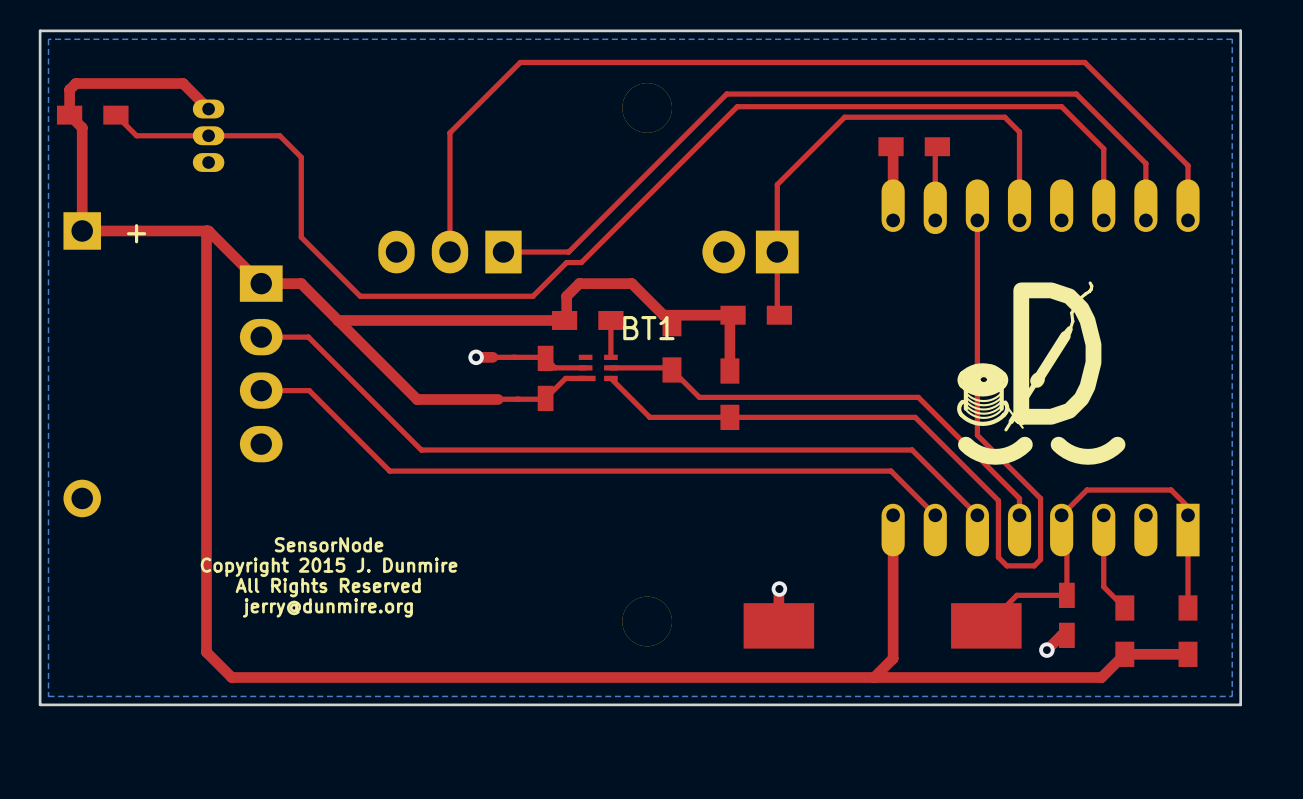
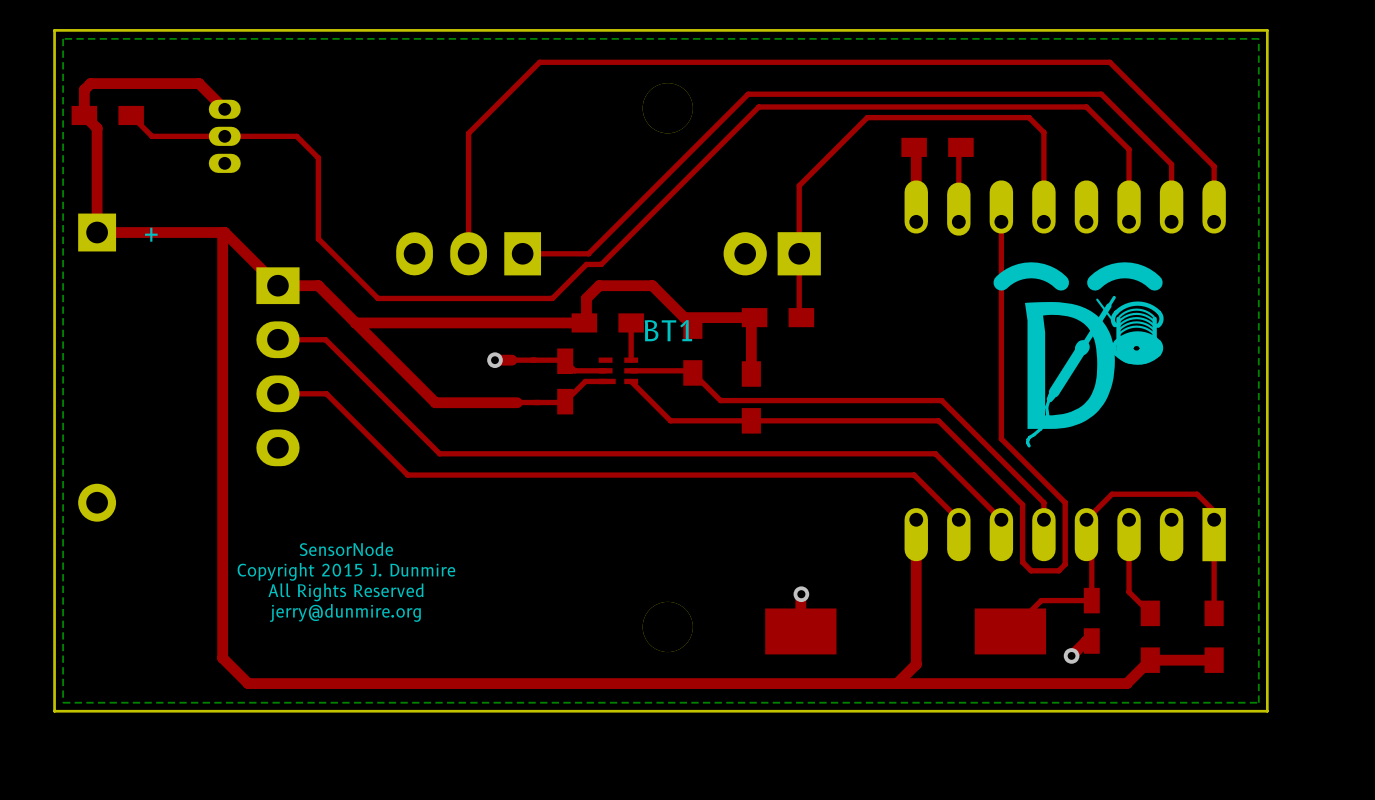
drawing: none -> [993, 262, 1164, 448]
drawing: [957, 281, 1126, 465] -> none

